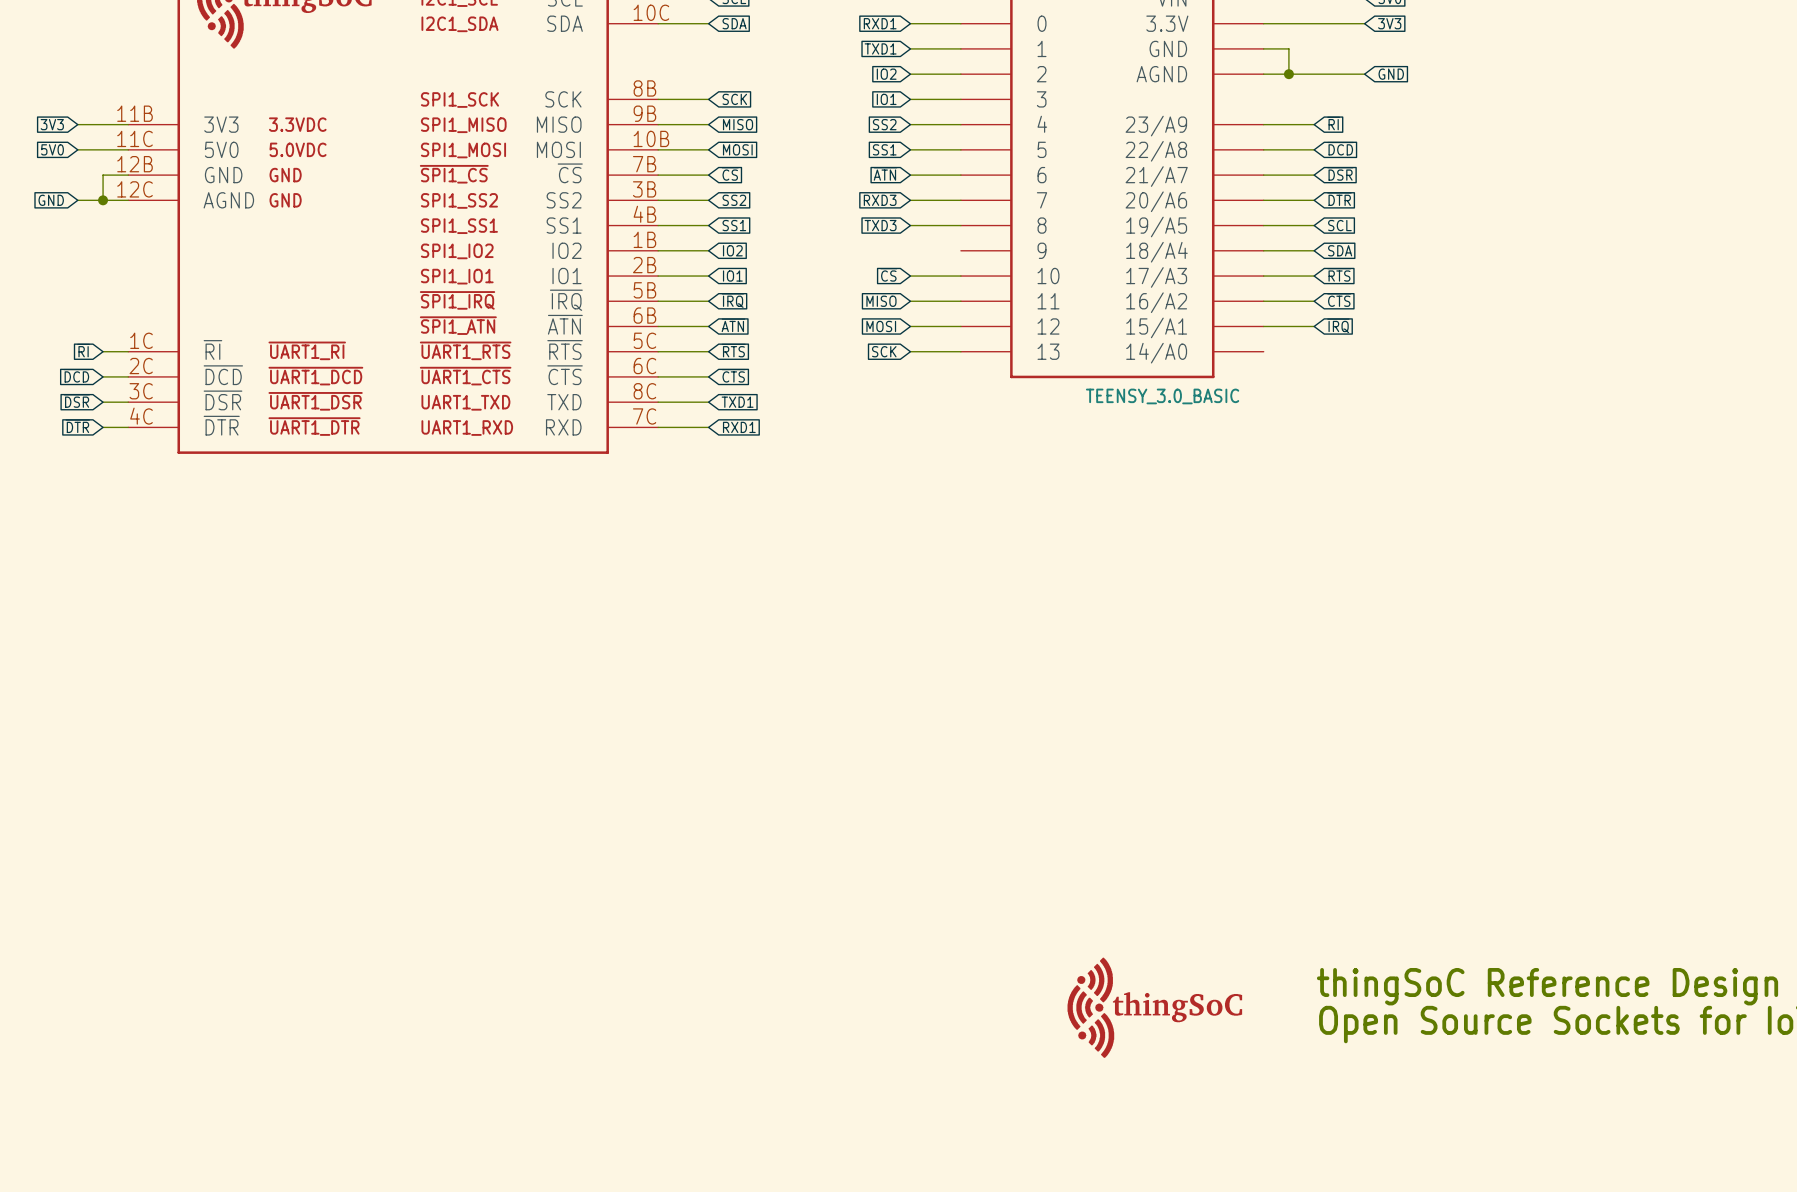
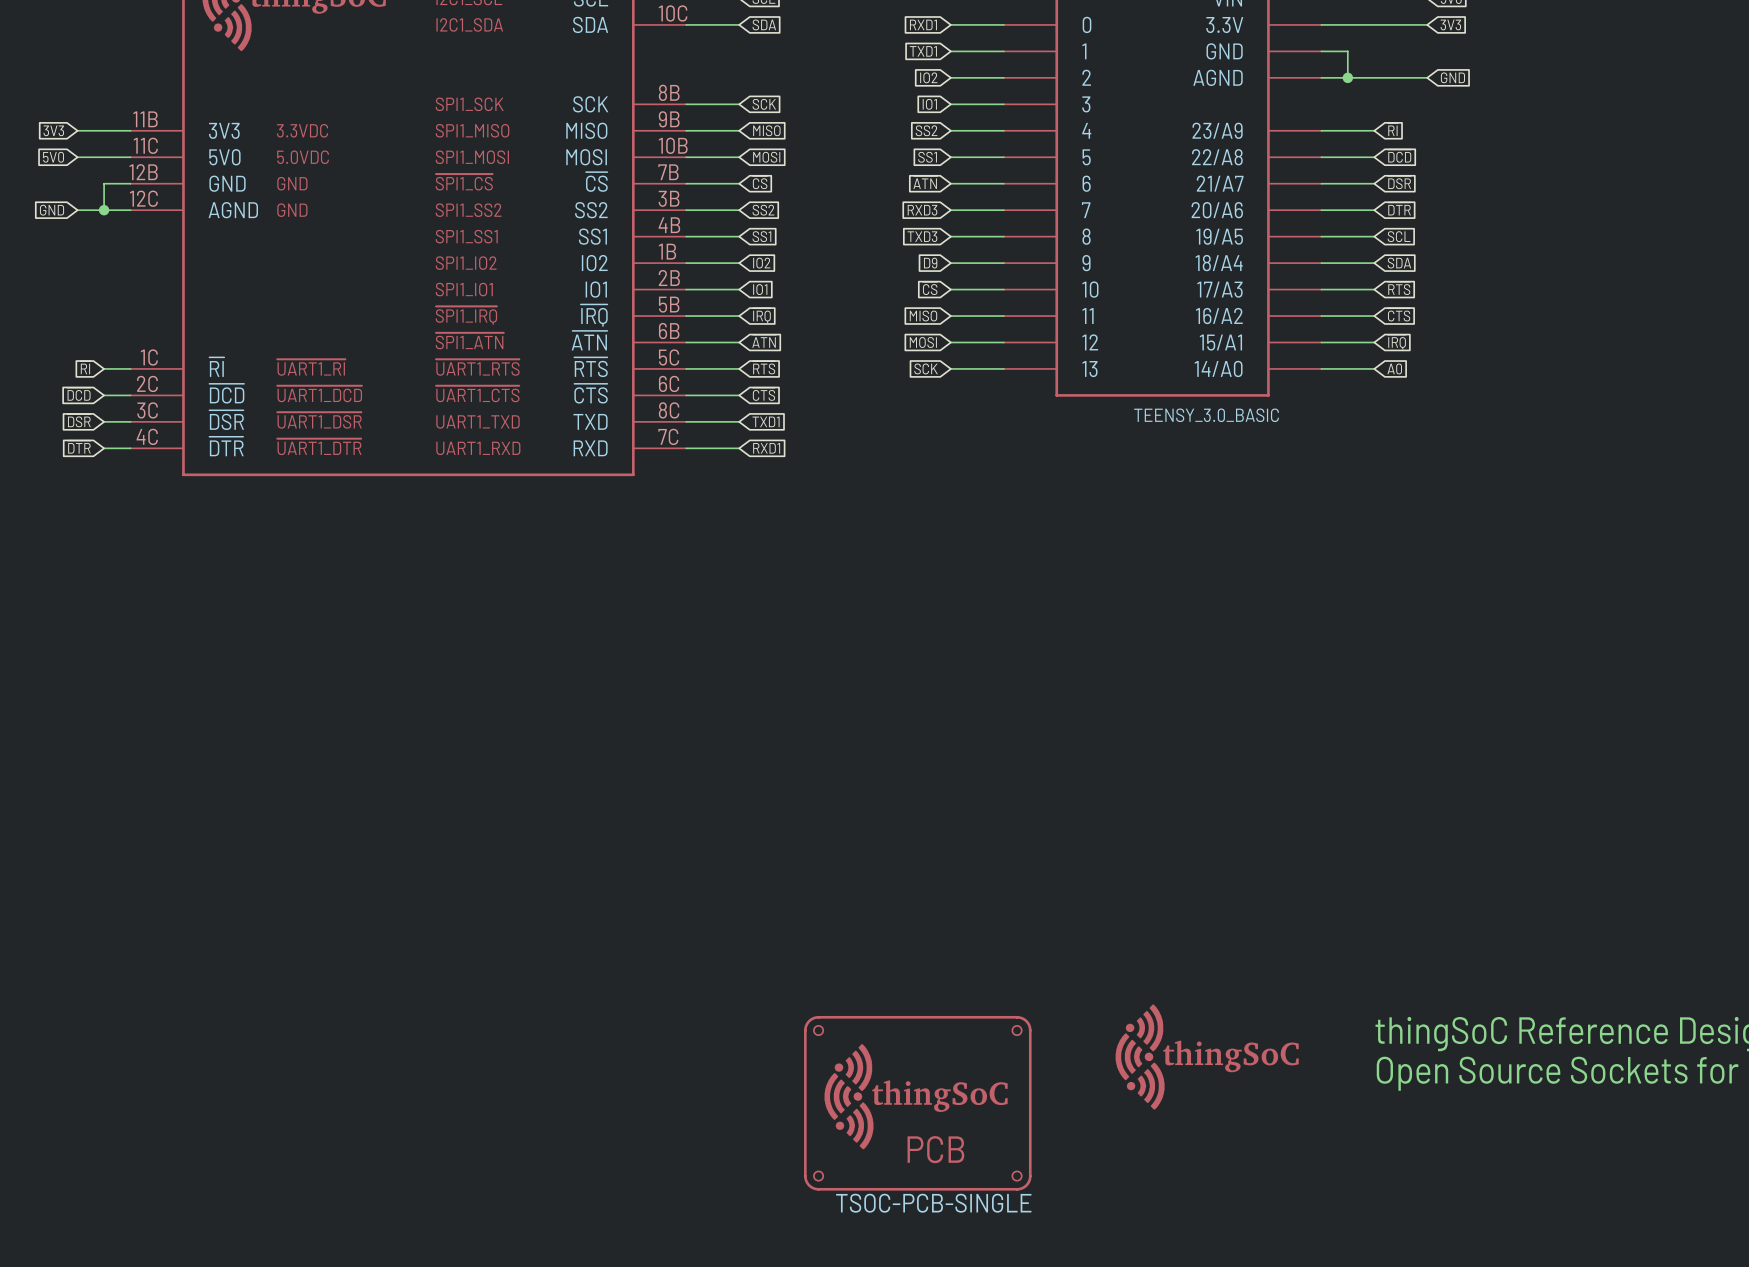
global label: none -> D9 (930, 263)
wire: none -> (950, 263) (1003, 263)
wire: none -> (1321, 368) (1374, 368)
global label: none -> A0 (1394, 368)
part: none -> TSOC-PCB-SINGLE (917, 1103)

